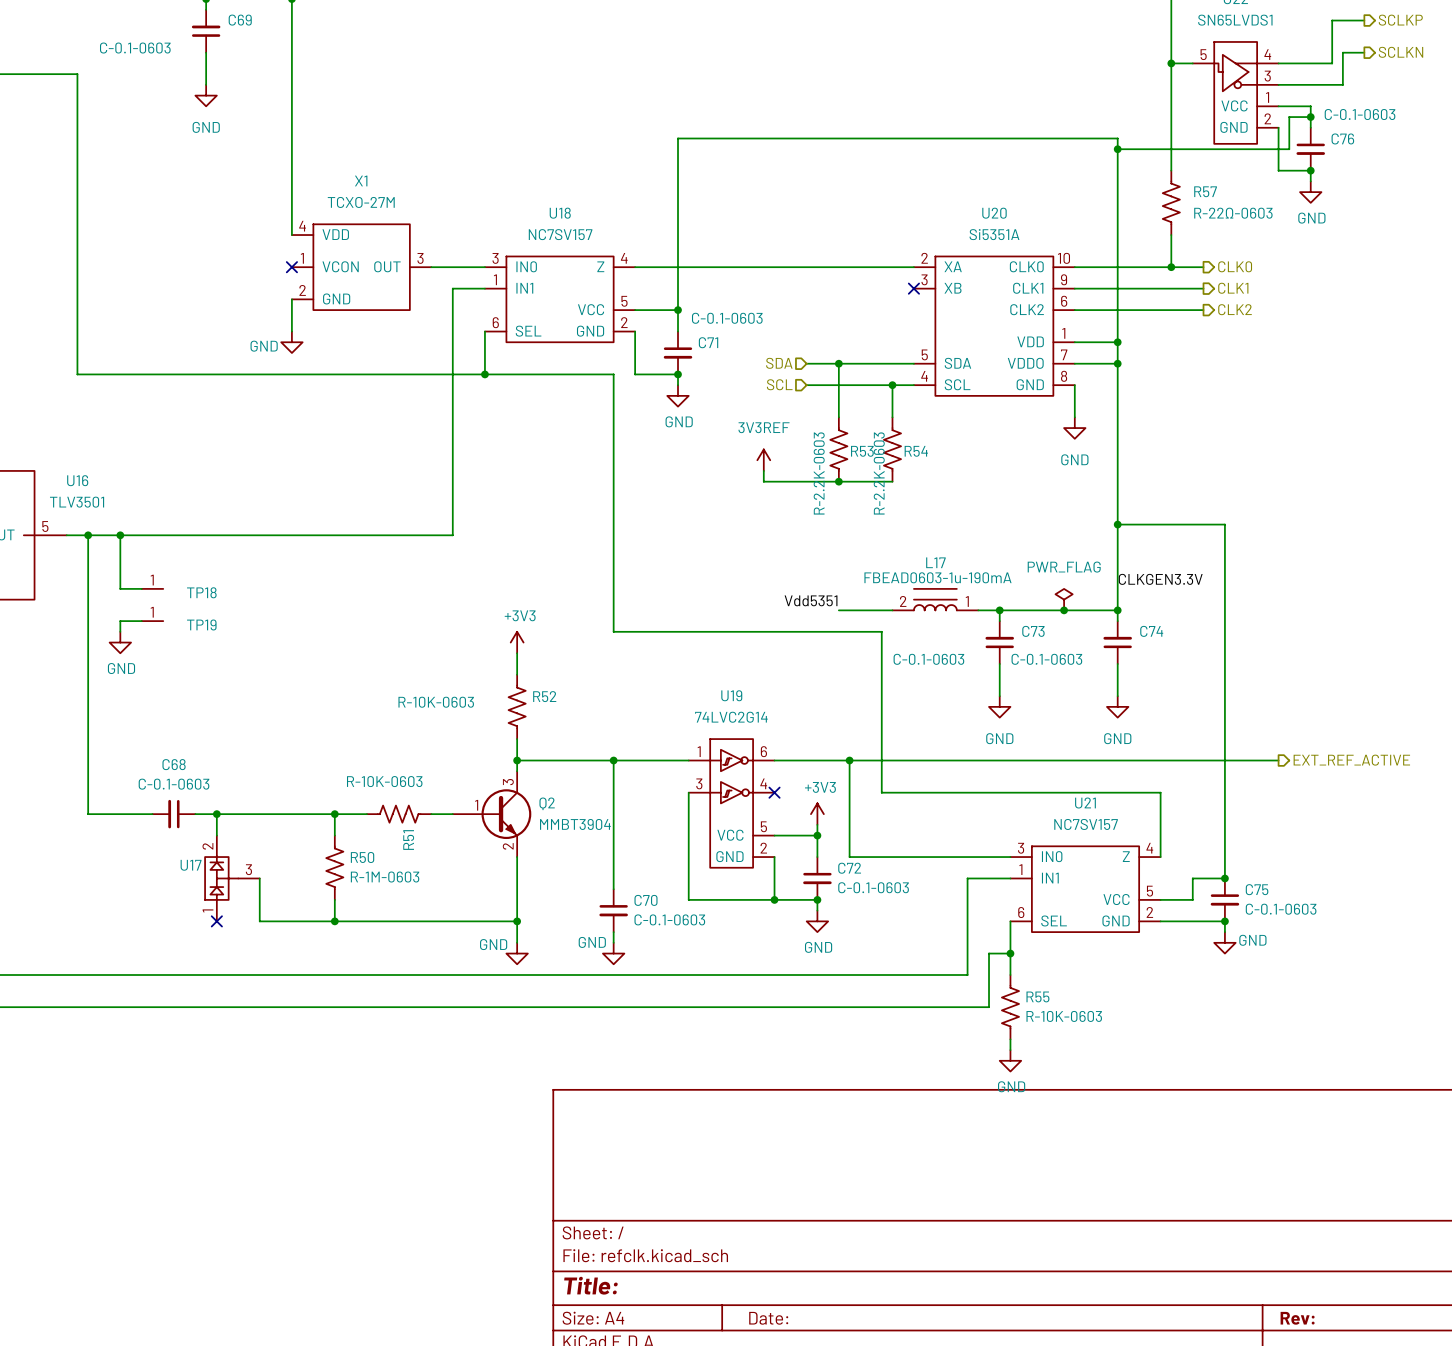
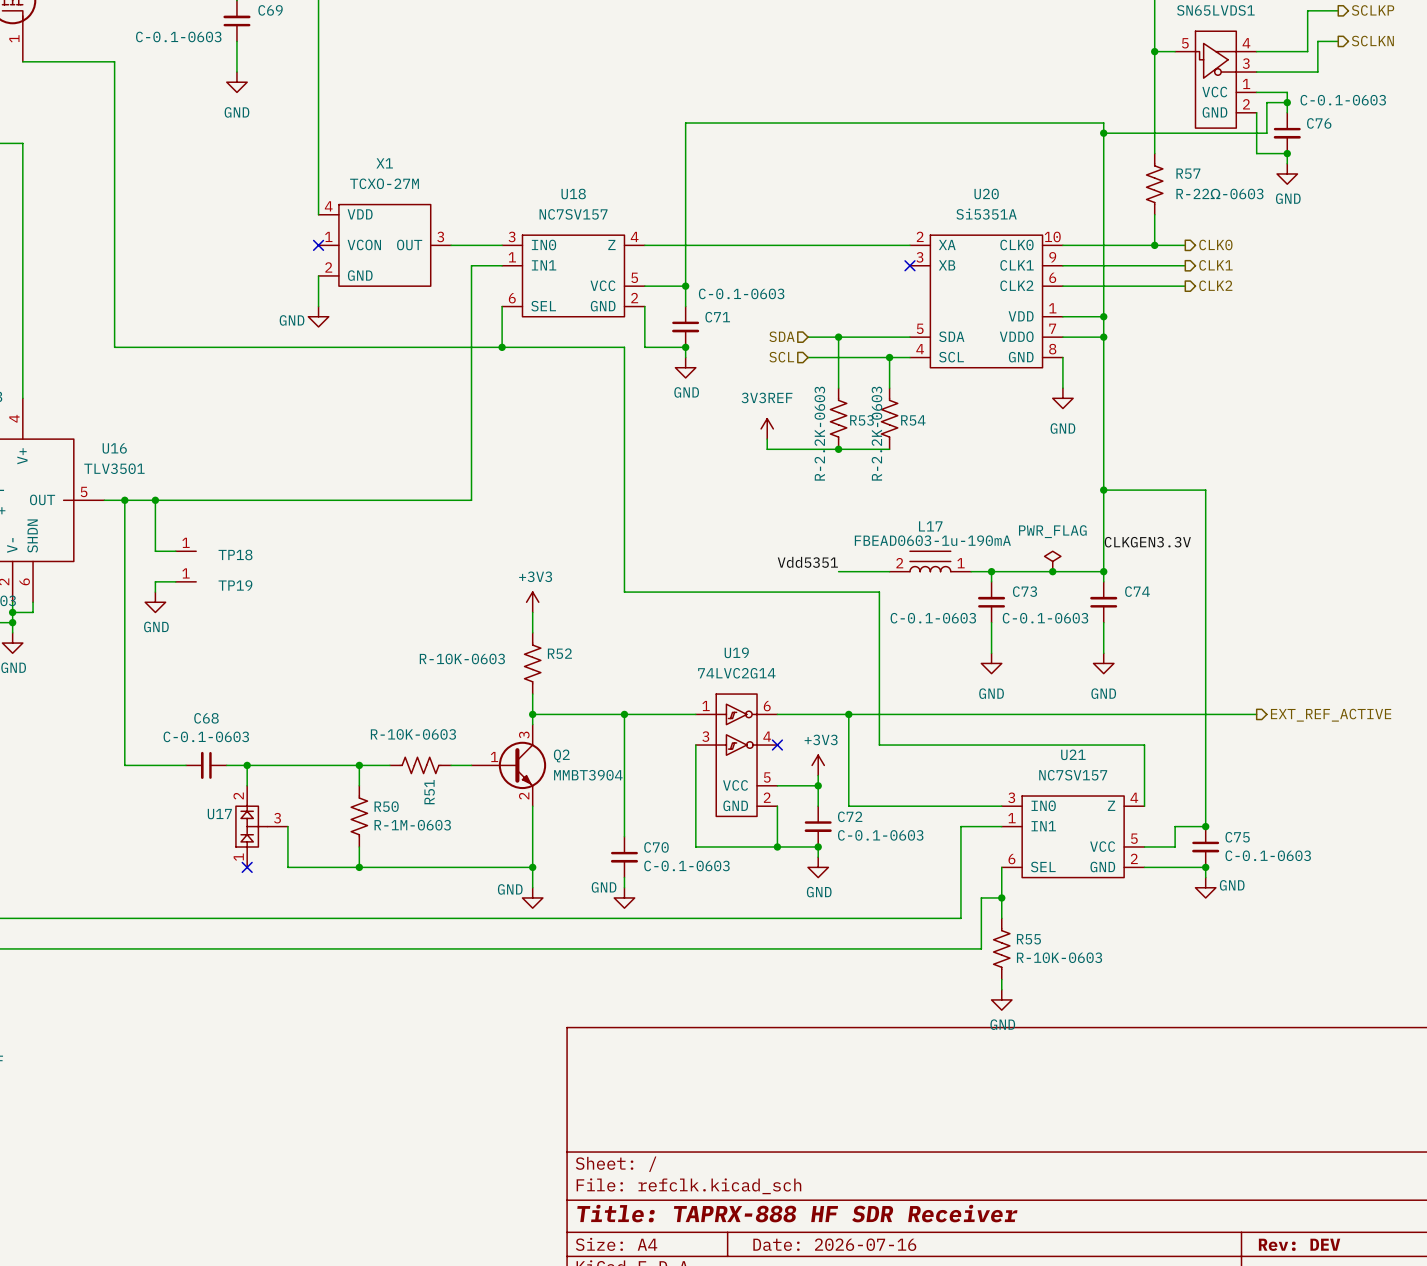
title block: Title: (590, 1285) -> Title: TAPRX-888 HF SDR Receiver (797, 1213)
title block: Date: (768, 1318) -> Date: 2026-07-16 (834, 1244)
title block: Rev: (1297, 1318) -> Rev: DEV (1299, 1244)

